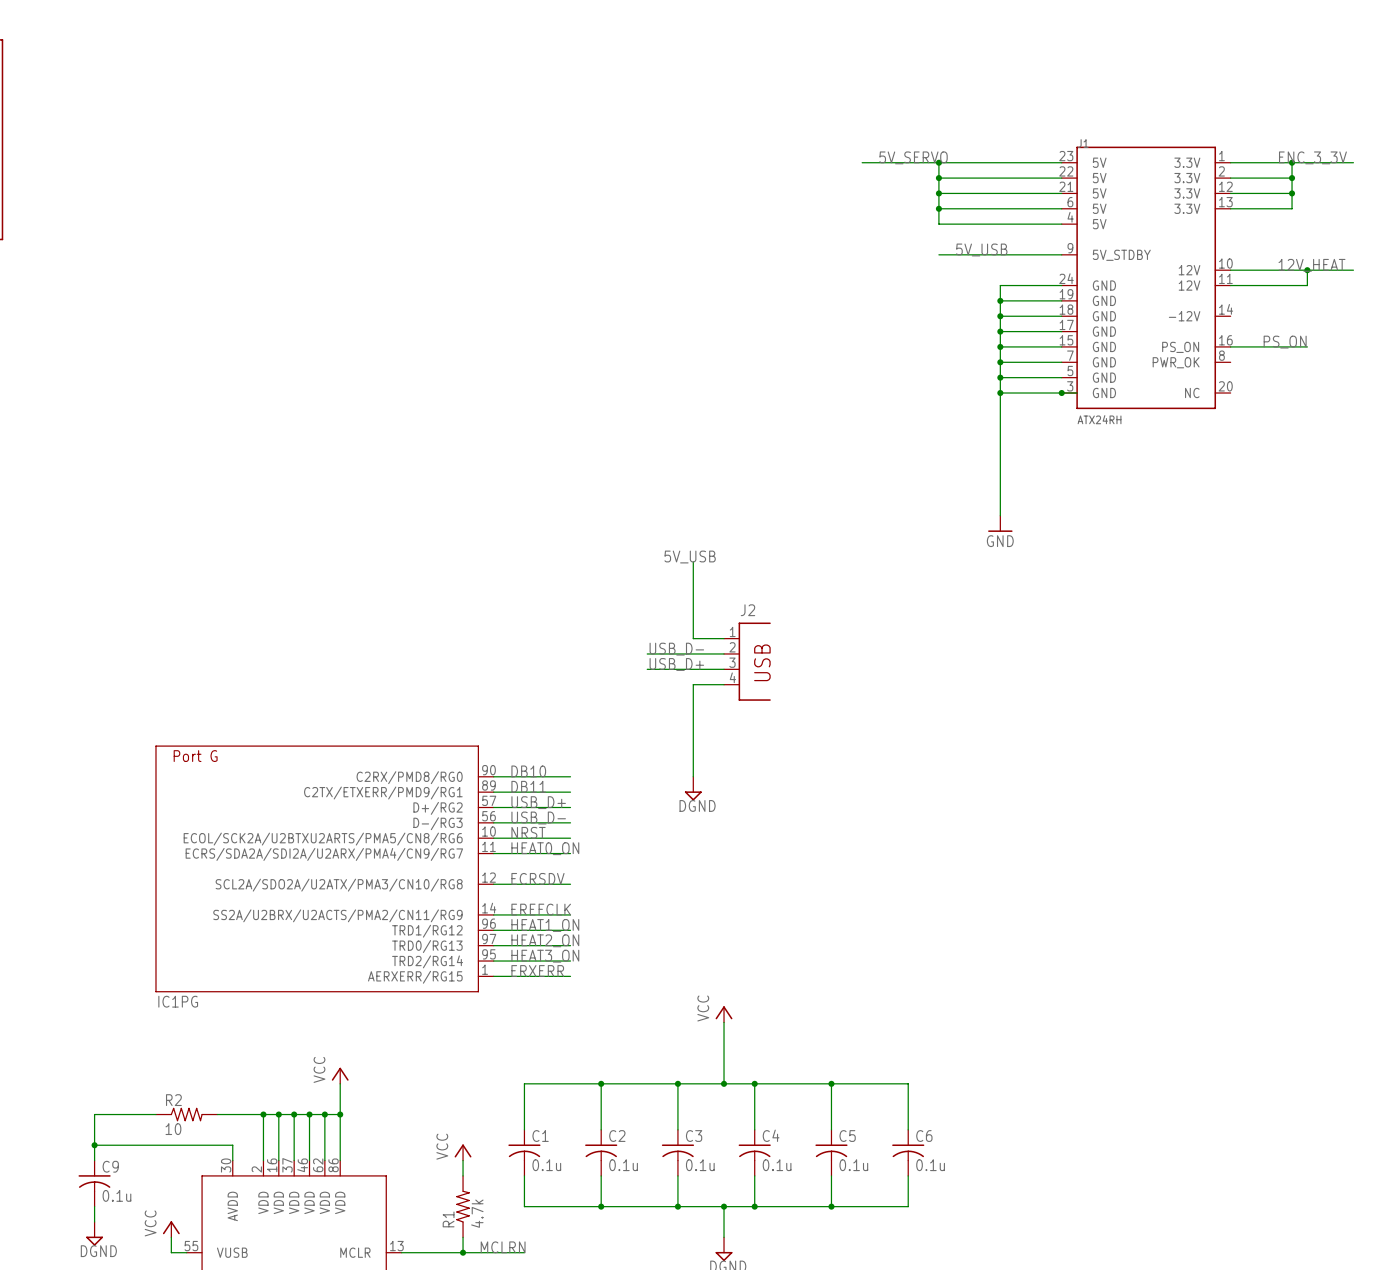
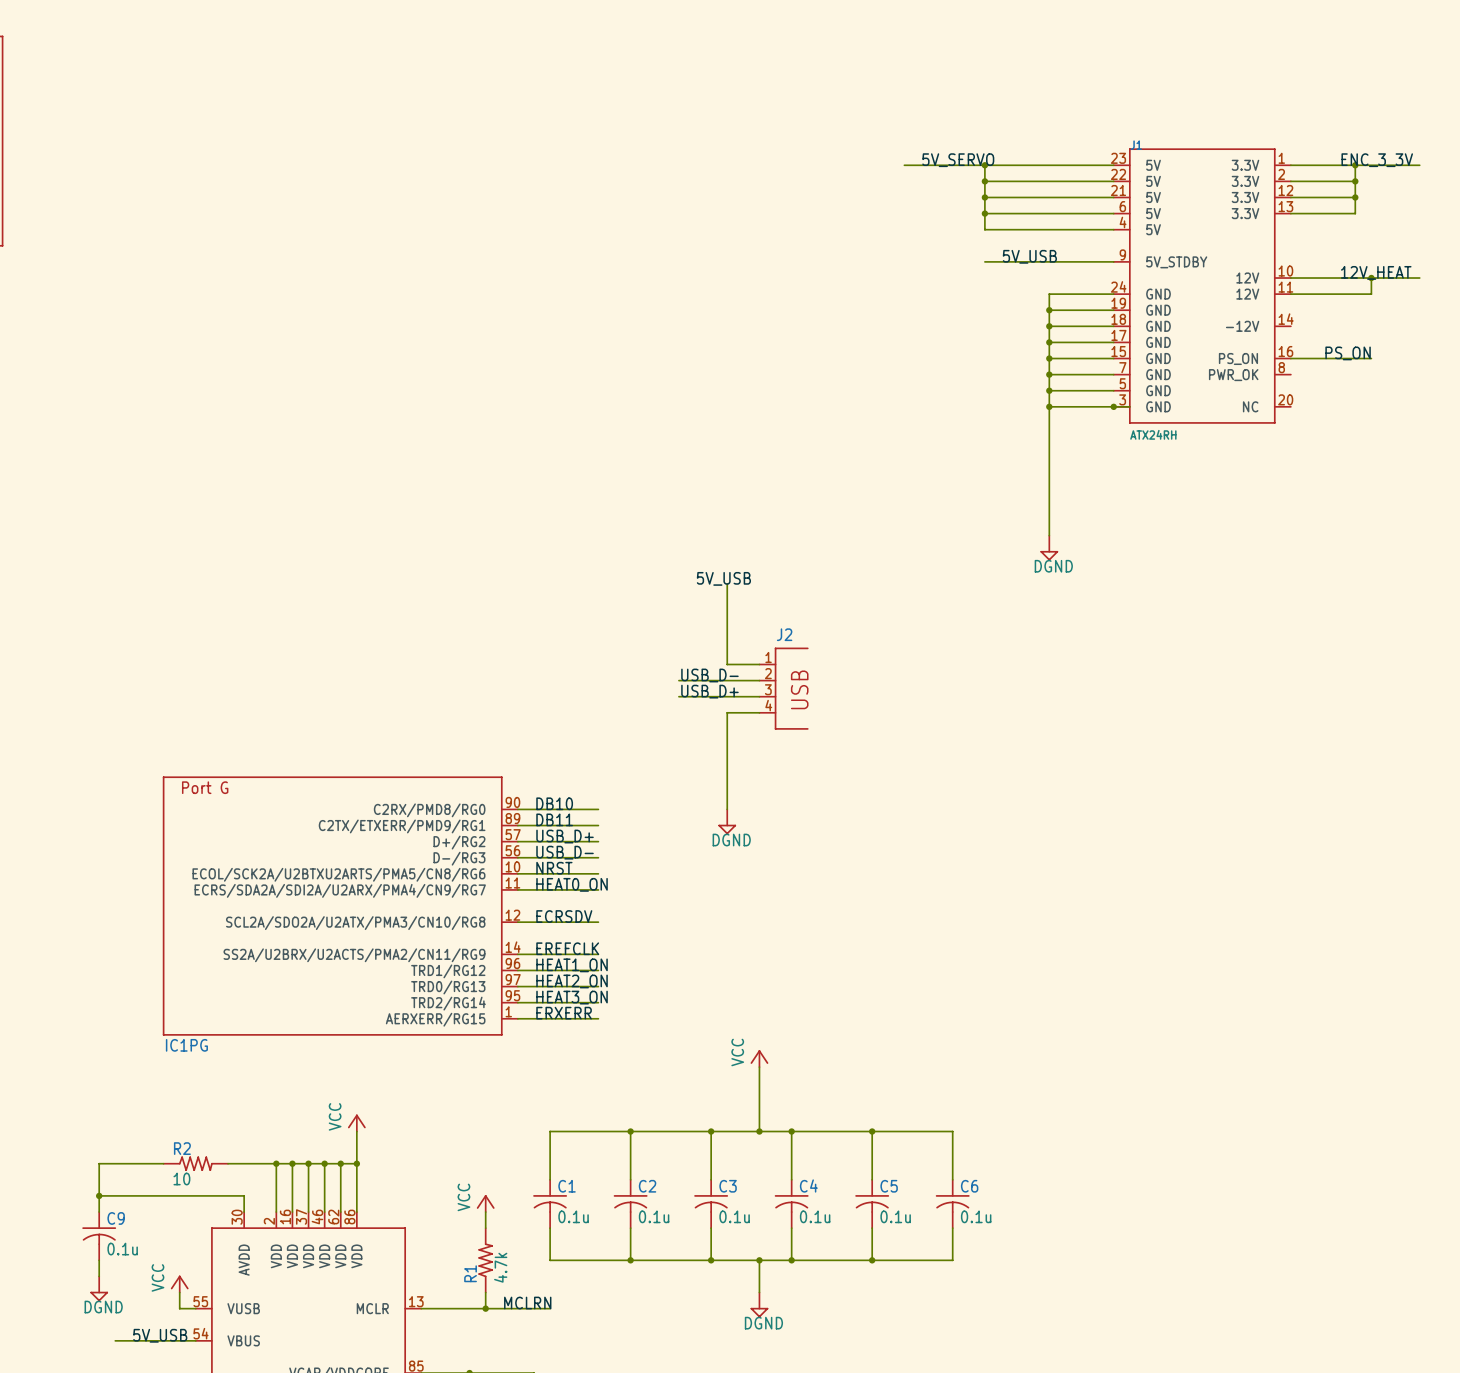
power symbol: GND (1000, 523) -> DGND (1049, 548)

